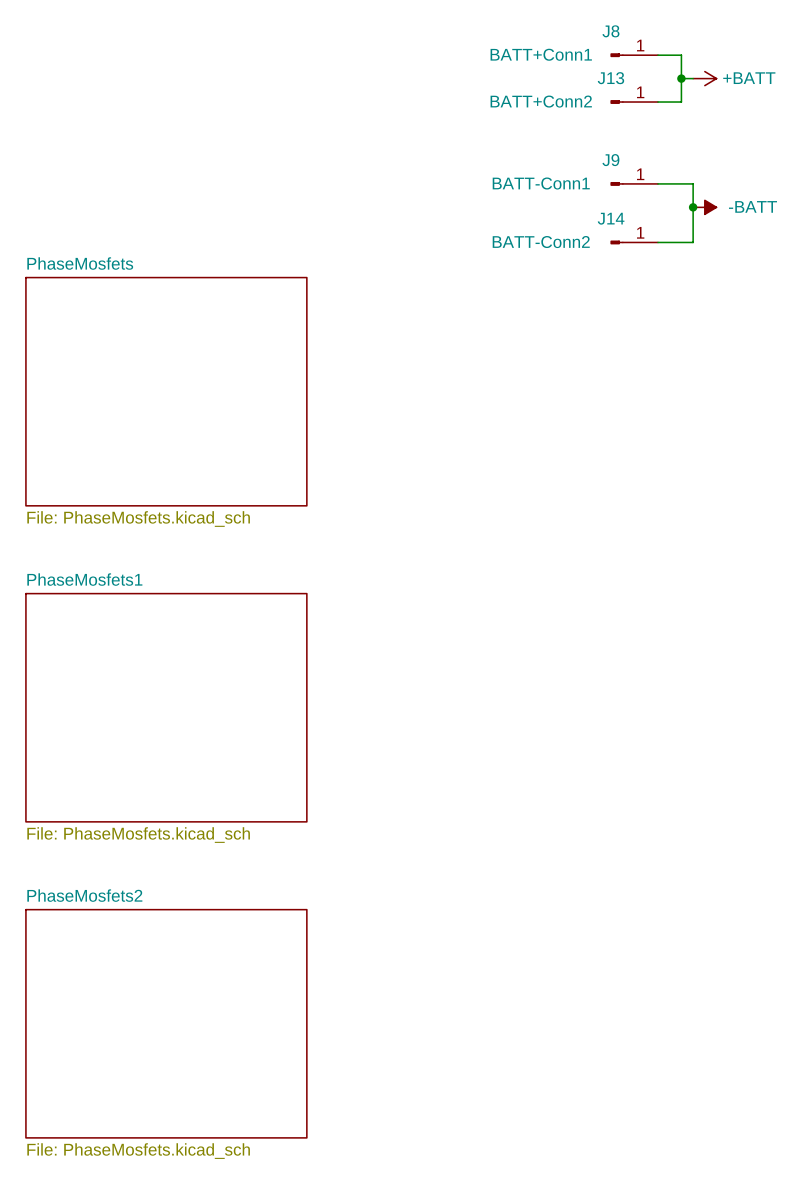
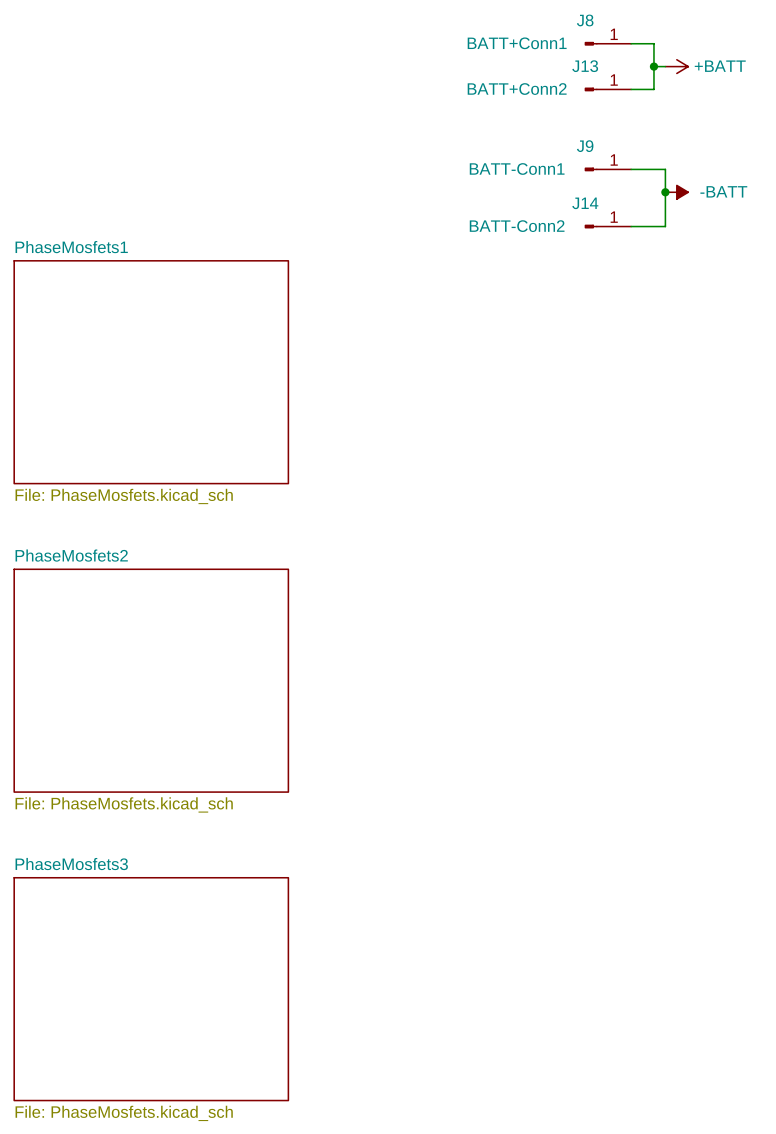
sheet PhaseMosfets name: PhaseMosfets (80, 263) -> PhaseMosfets1 (71, 247)
sheet PhaseMosfets1 name: PhaseMosfets1 (84, 579) -> PhaseMosfets2 (71, 555)
sheet PhaseMosfets2 name: PhaseMosfets2 (84, 895) -> PhaseMosfets3 (71, 864)

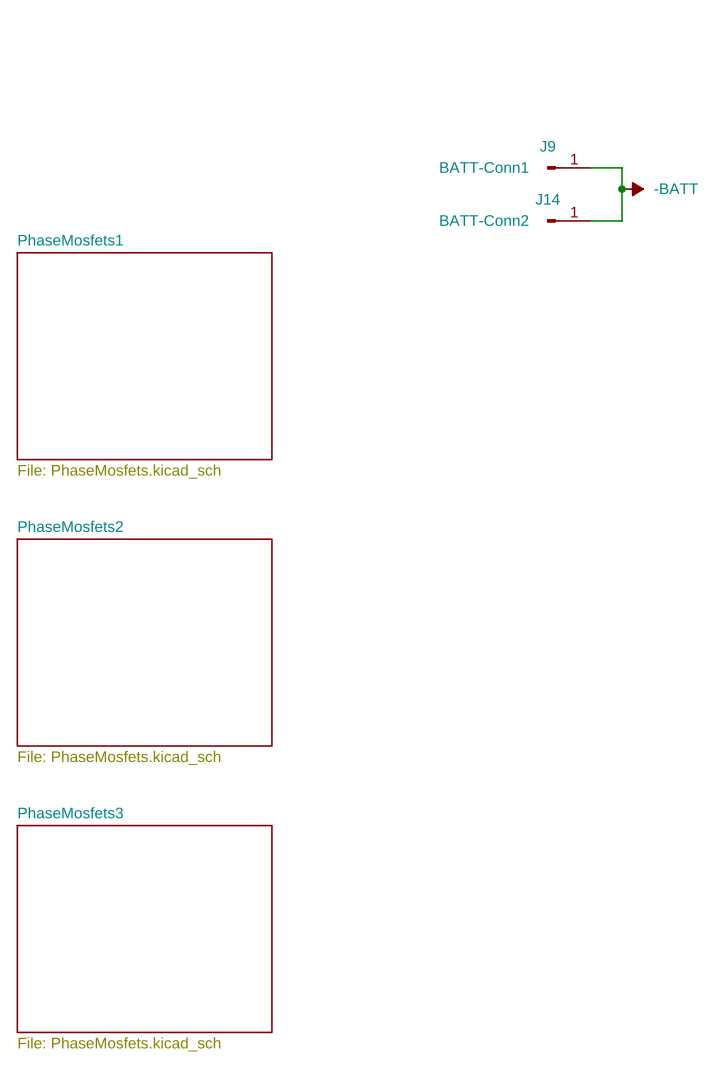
J8: BATT+Conn1 (607, 43) -> none
wire: (631, 43) (653, 43) (653, 89) (631, 89) -> none
wire: (653, 66) (665, 66) -> none
junction: (653, 66) -> none
power symbol: +BATT (676, 66) -> none
J13: BATT+Conn2 (607, 89) -> none

